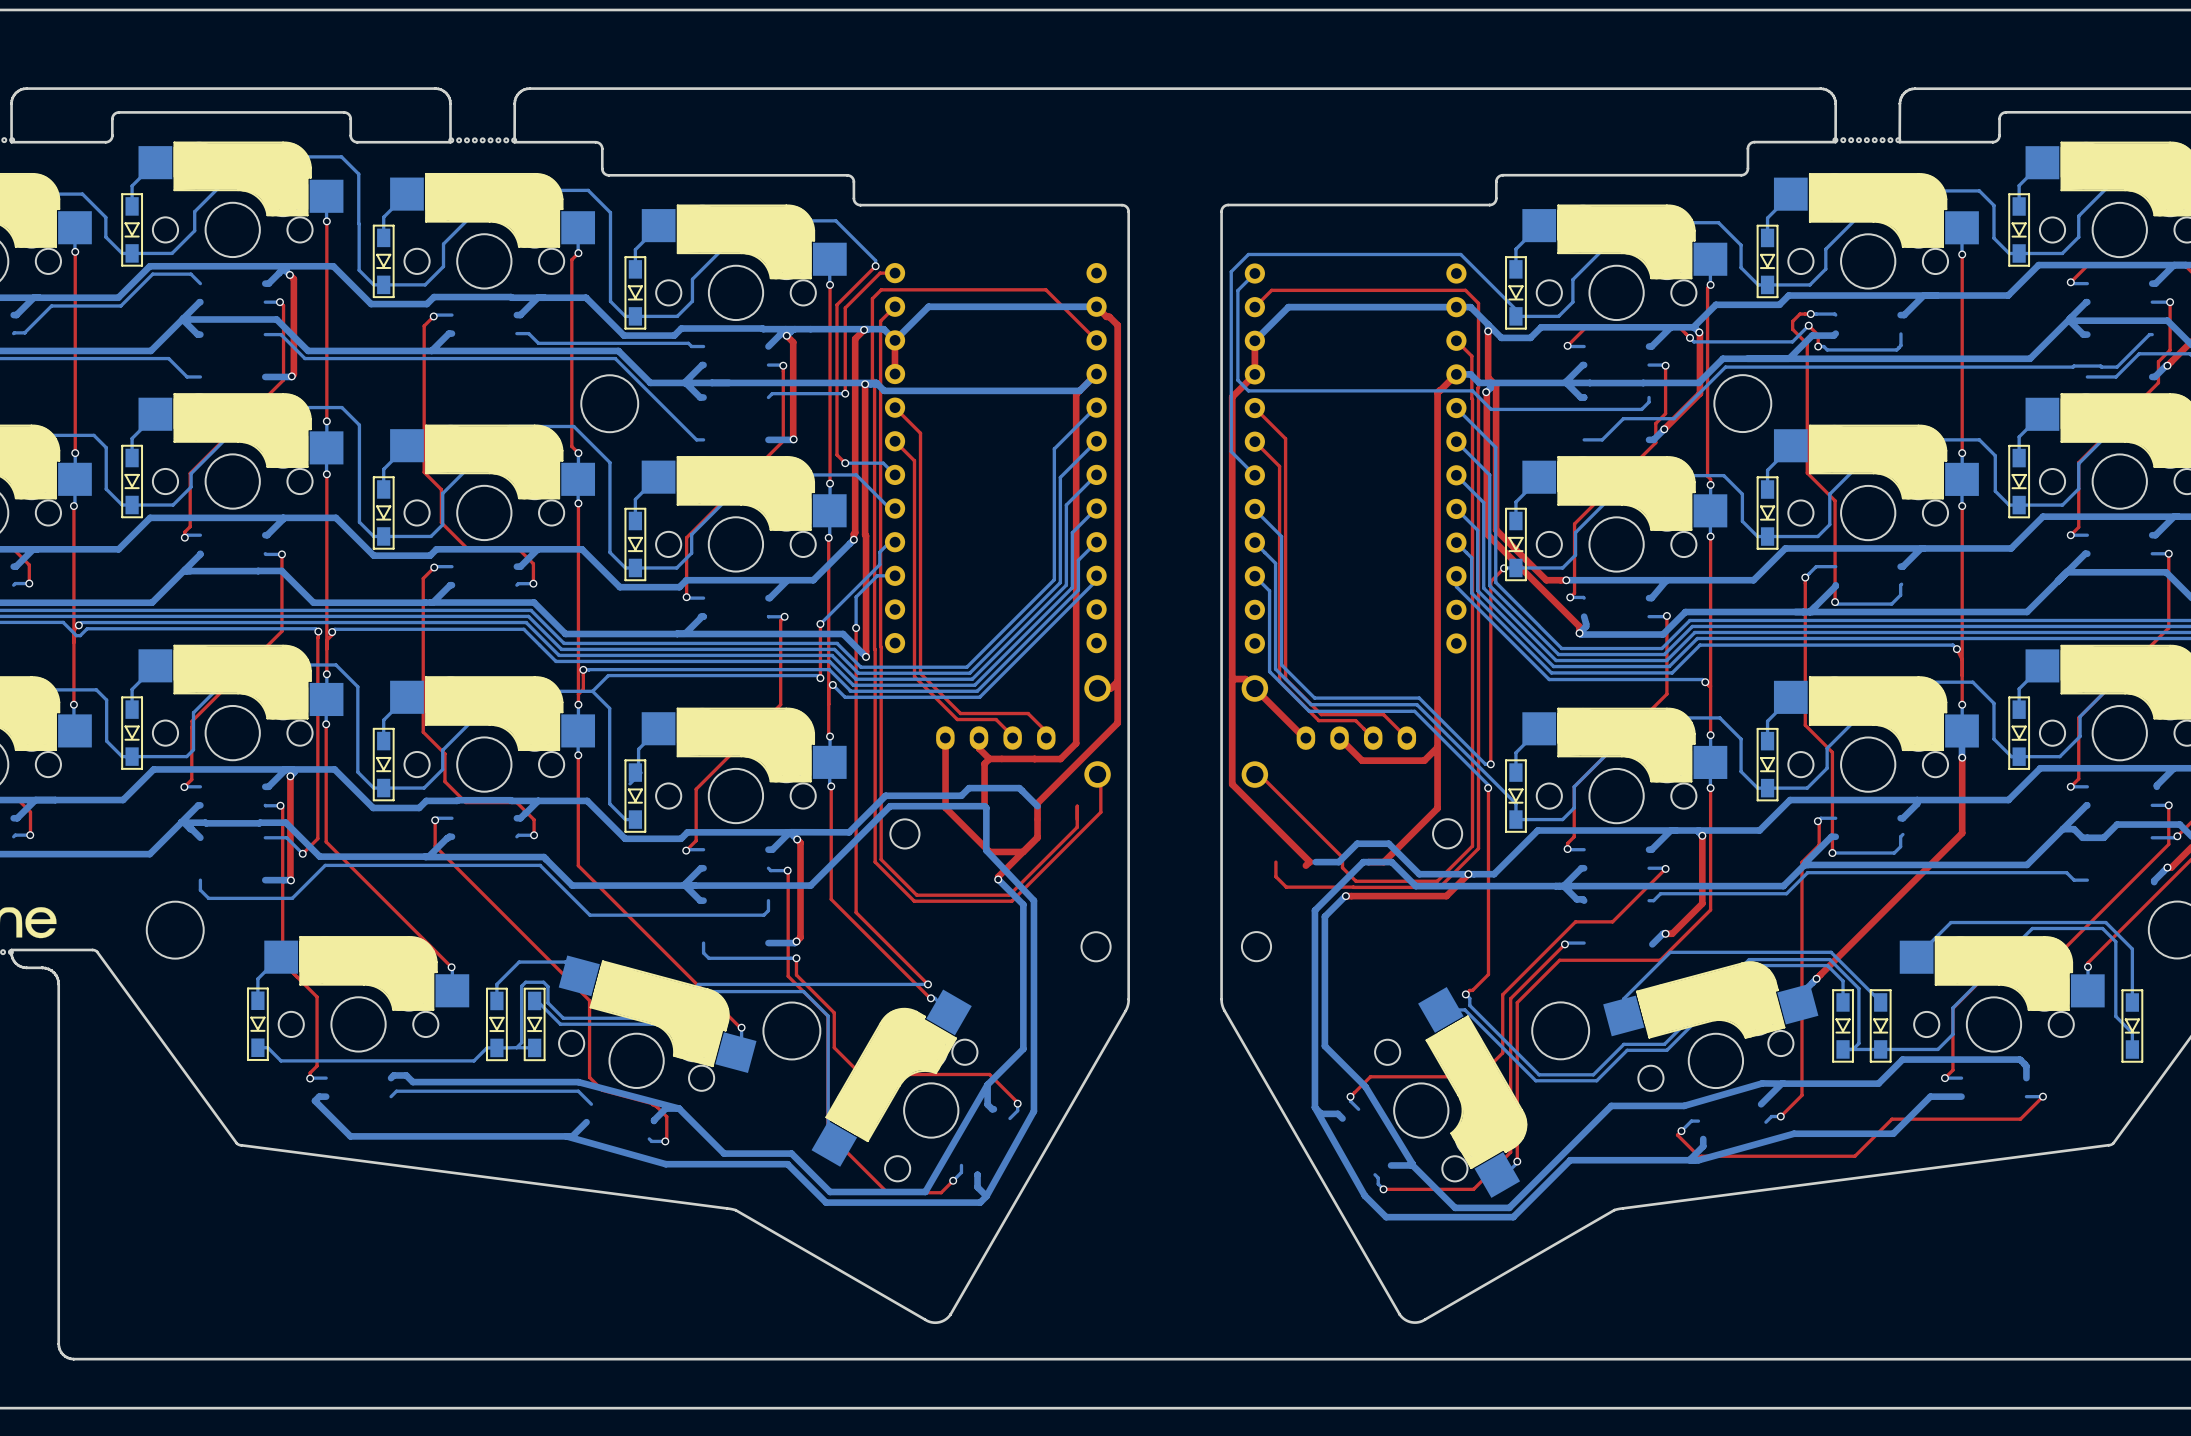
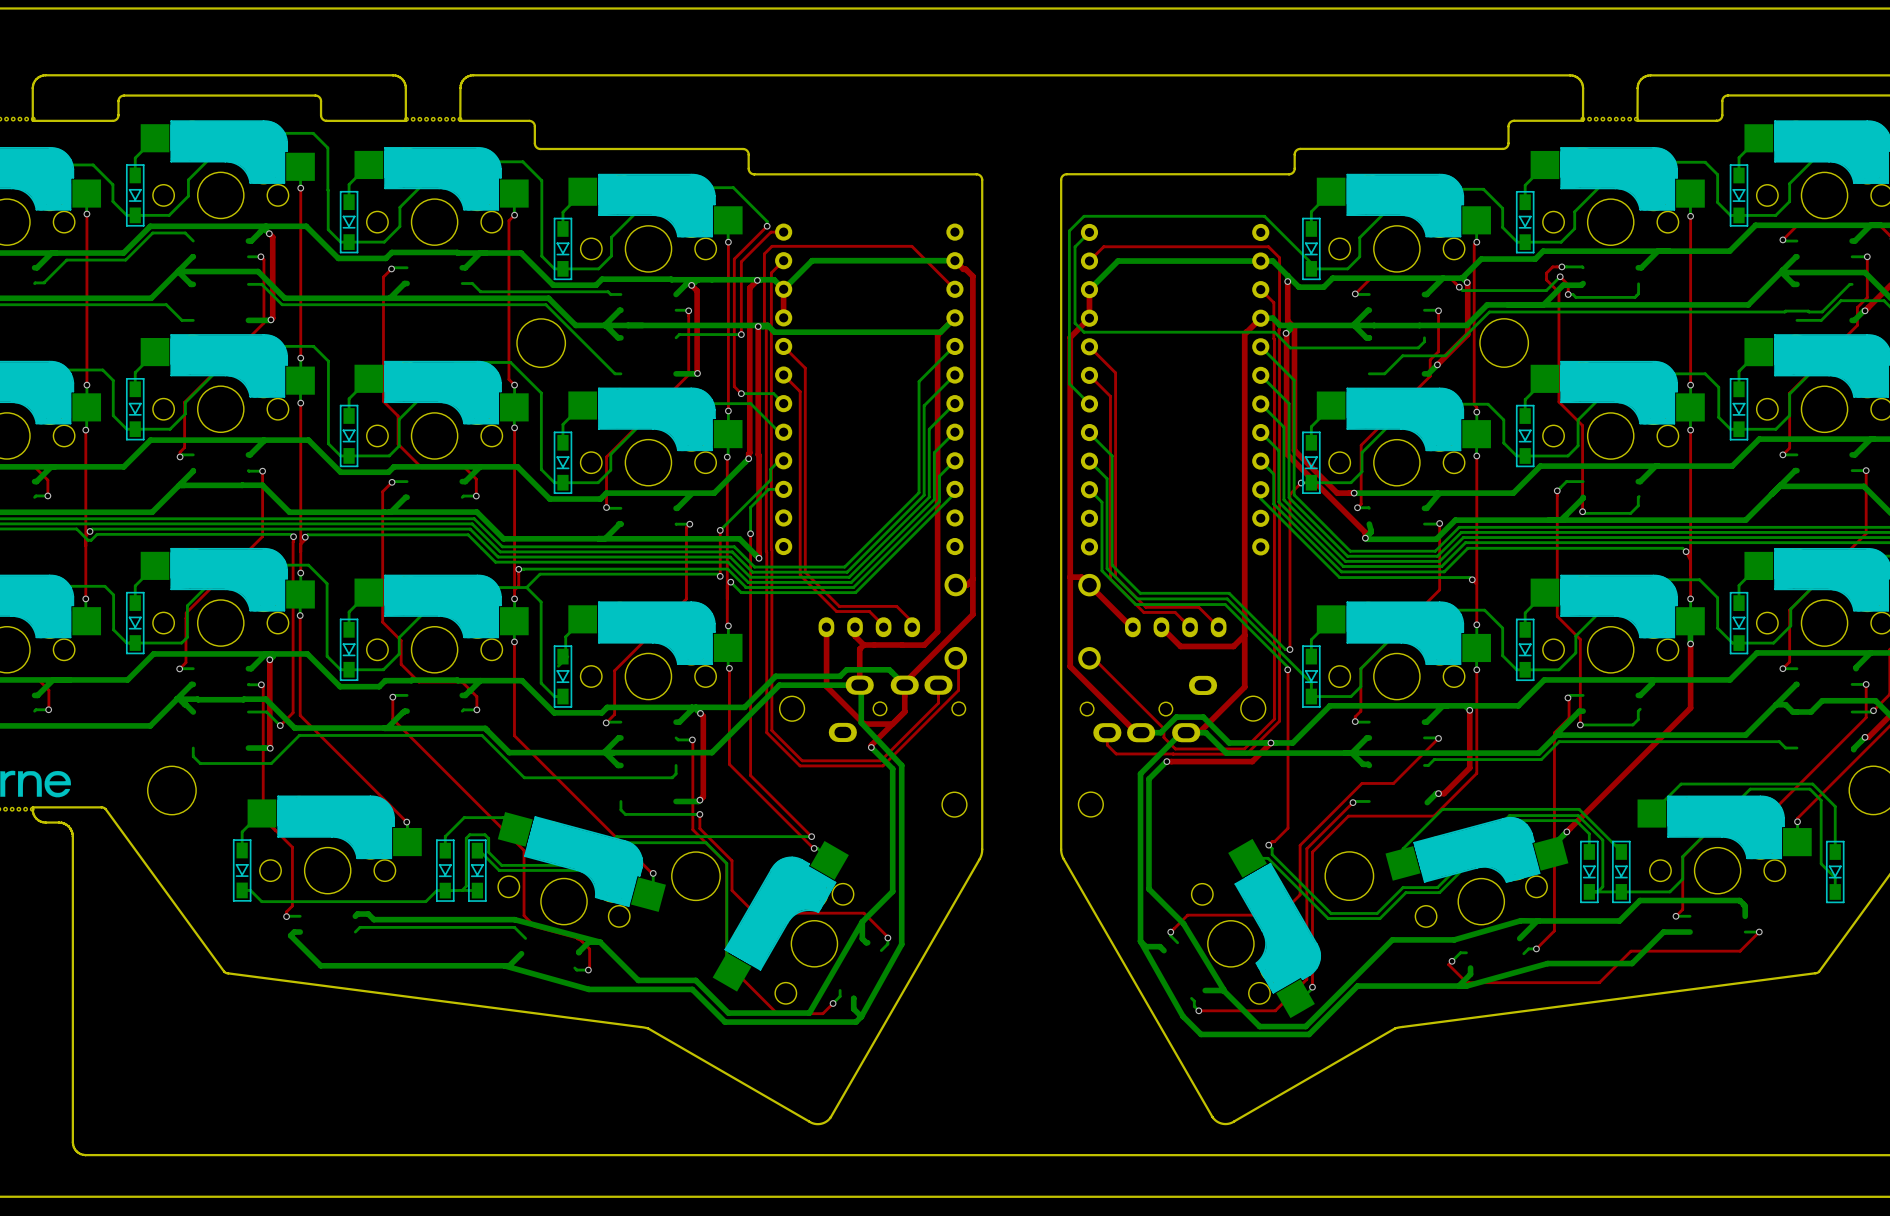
part: none -> (897, 708)
part: none -> (1148, 709)

